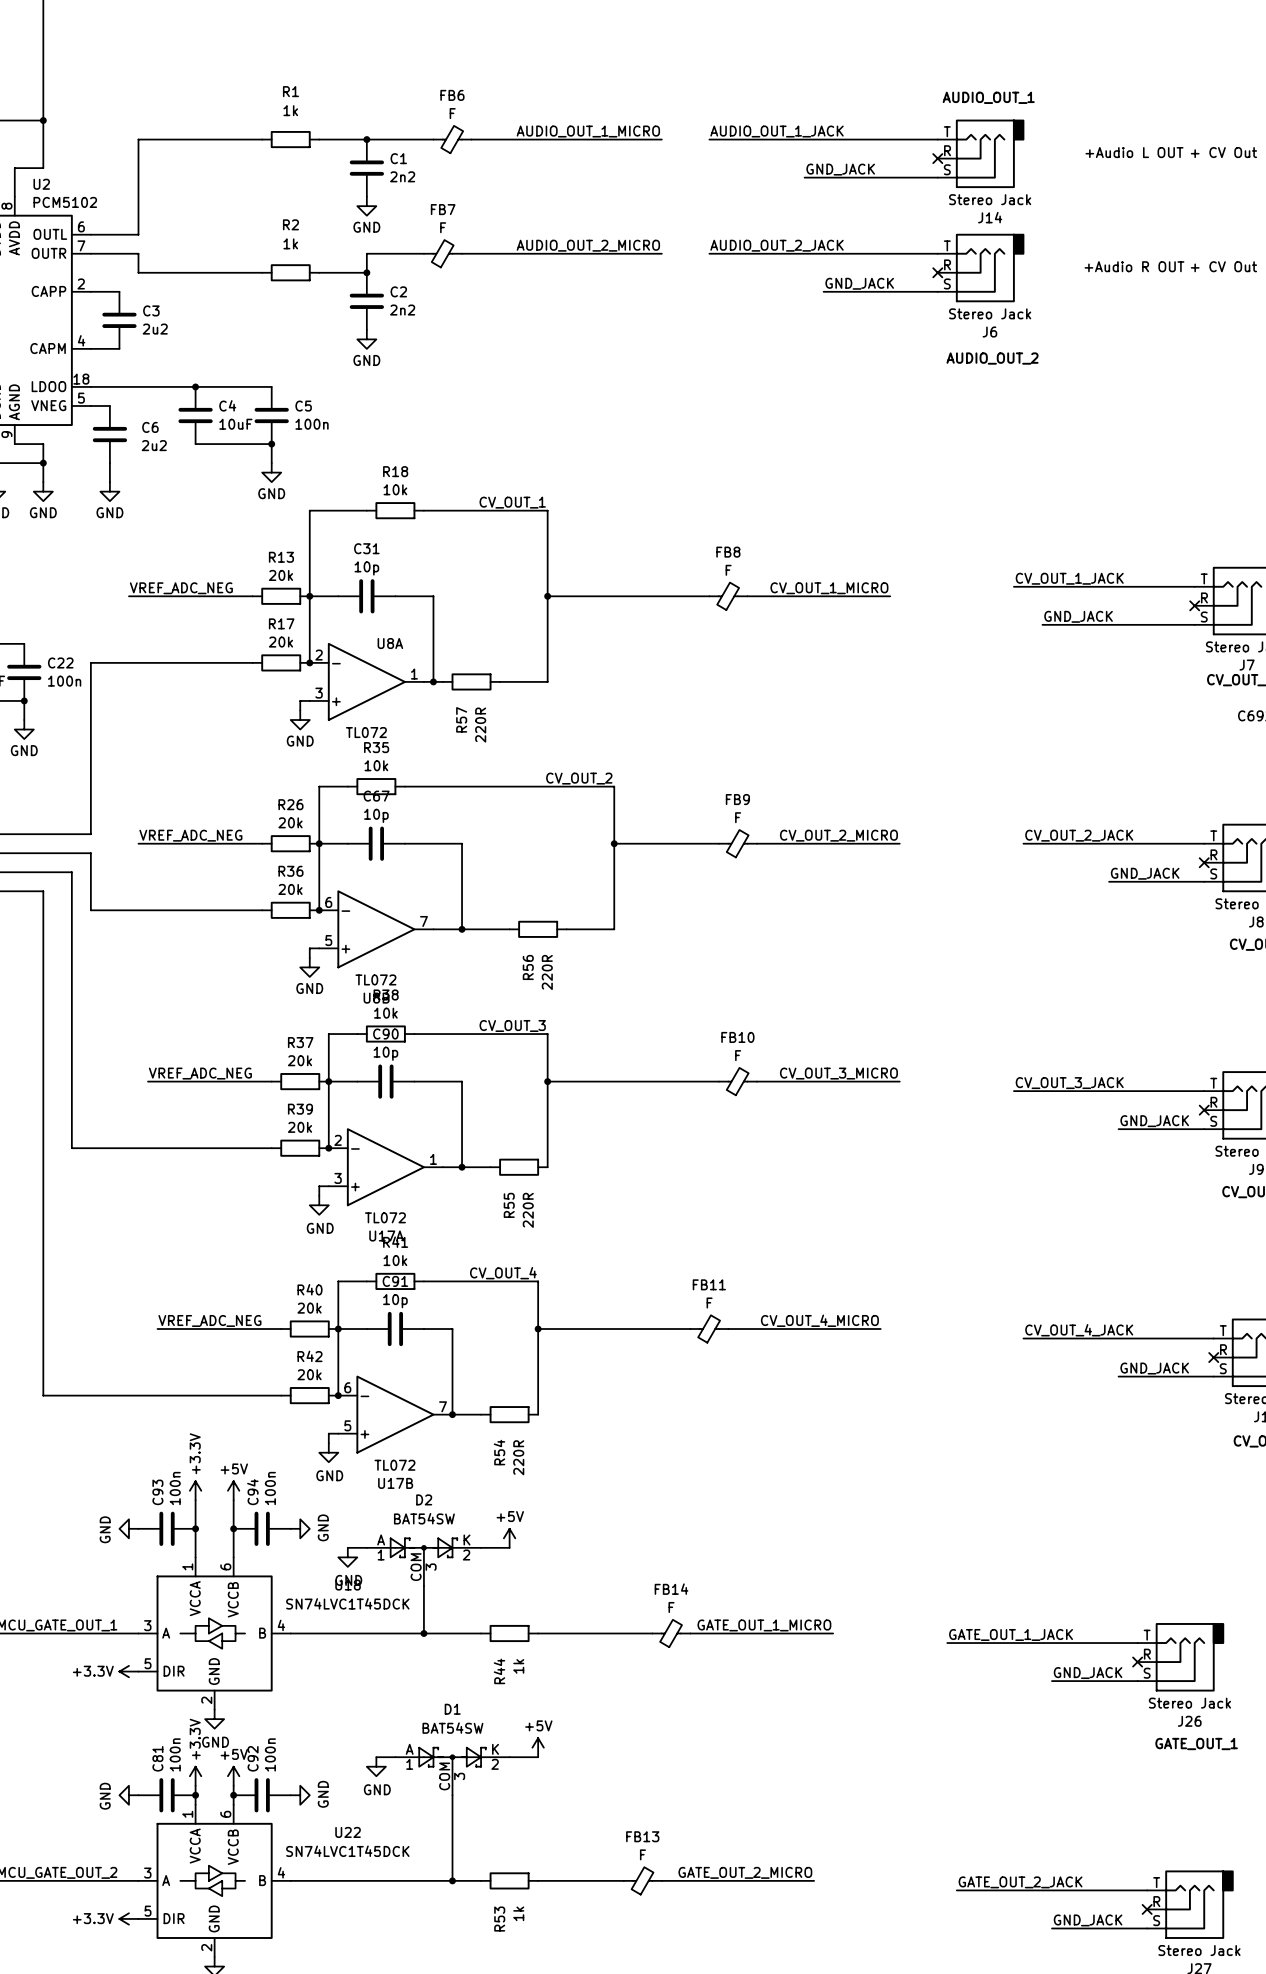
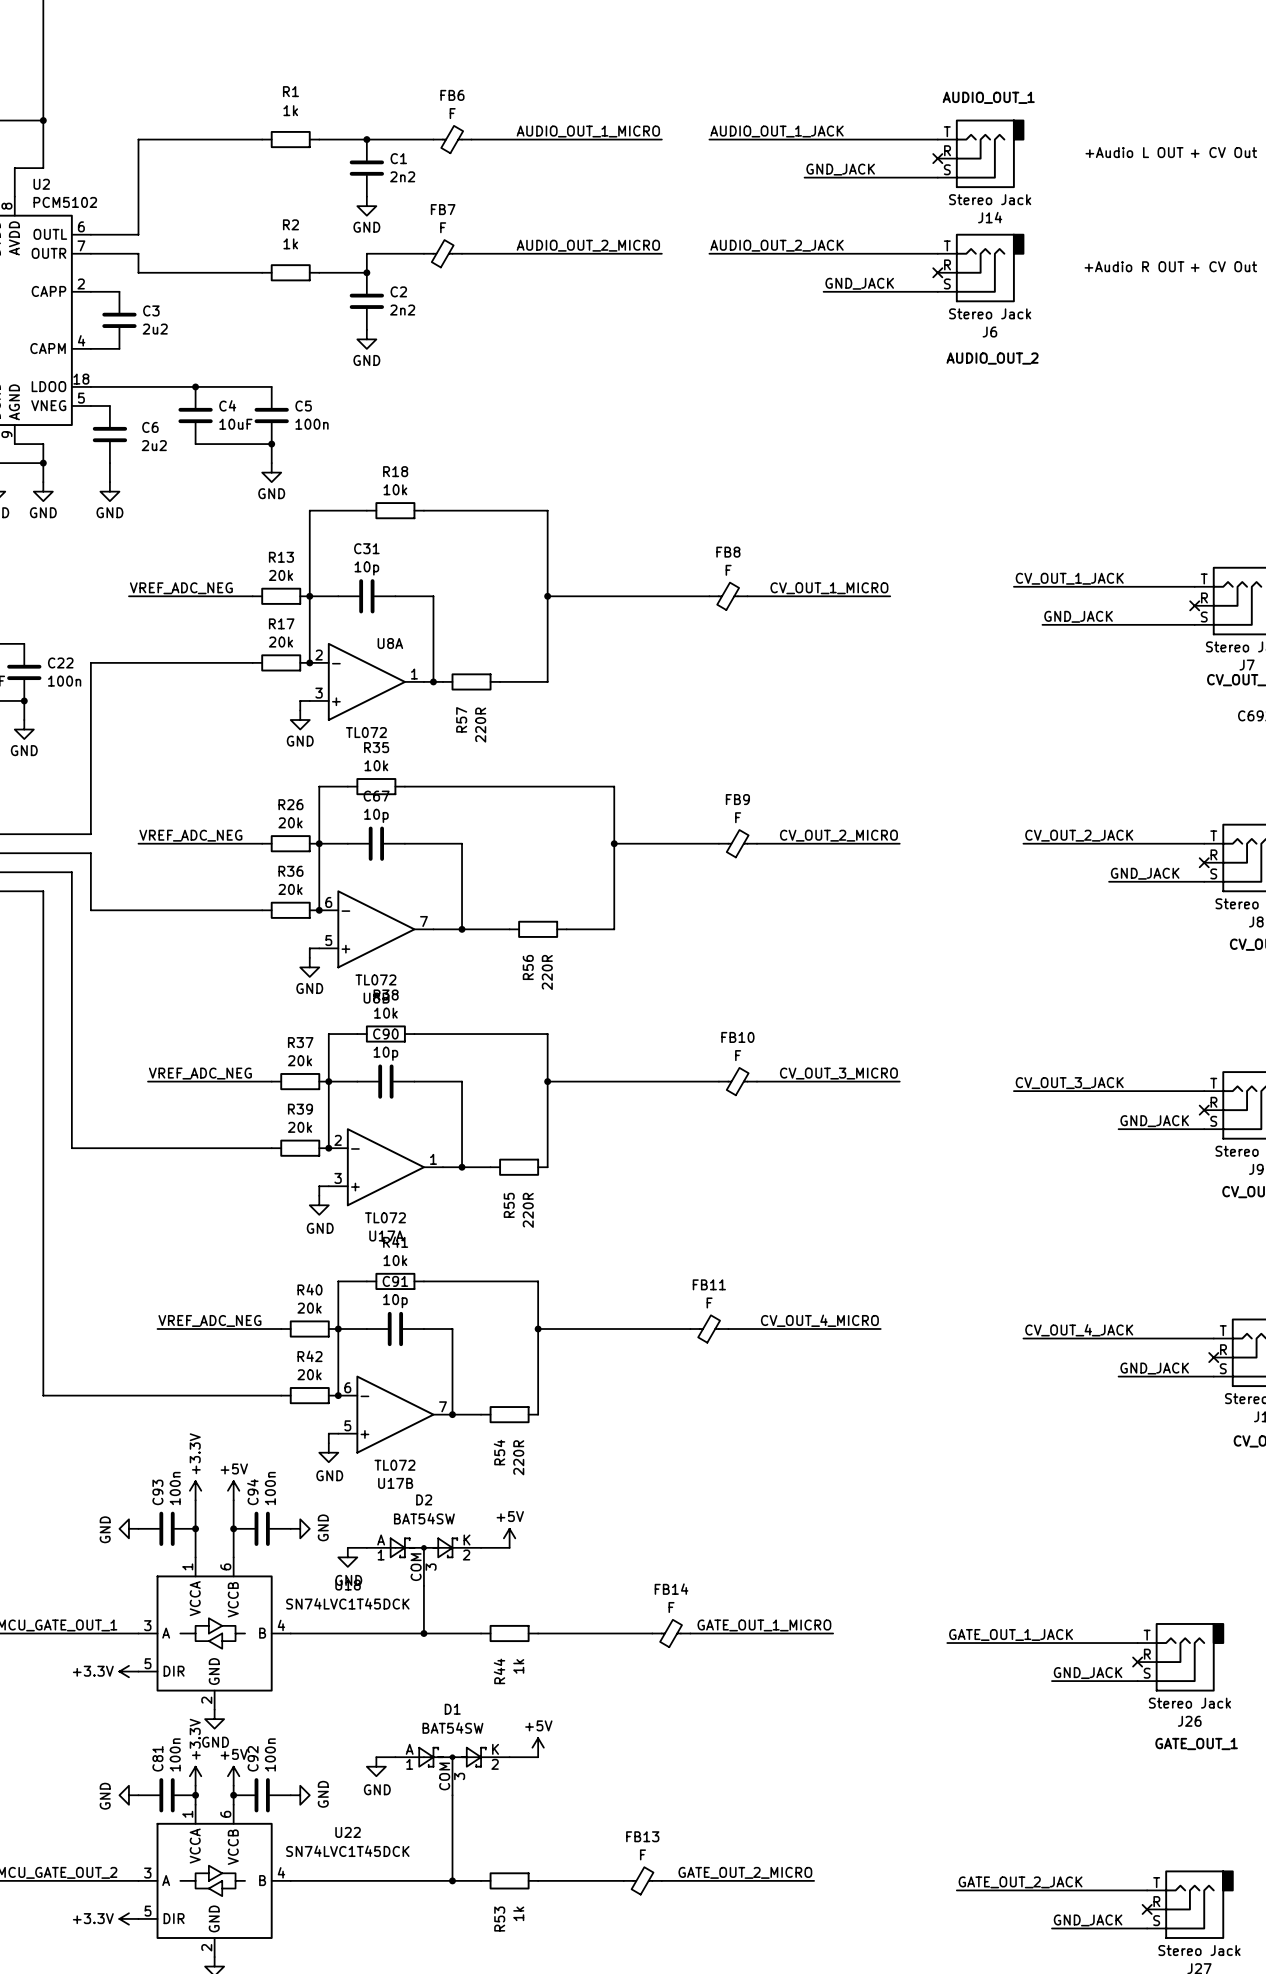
label: CV_OUT_1 (512, 502) -> none
label: CV_OUT_2 (579, 778) -> none
label: CV_OUT_3 (512, 1025) -> none
label: CV_OUT_4 (503, 1273) -> none

